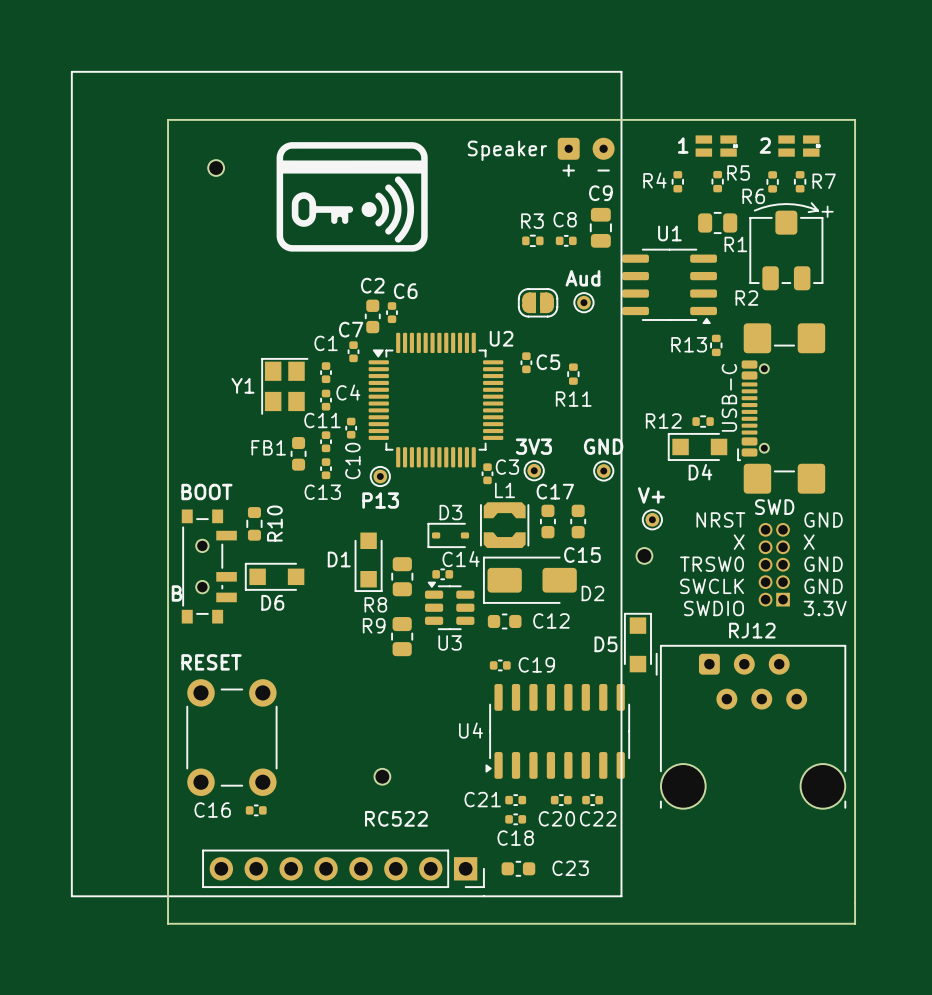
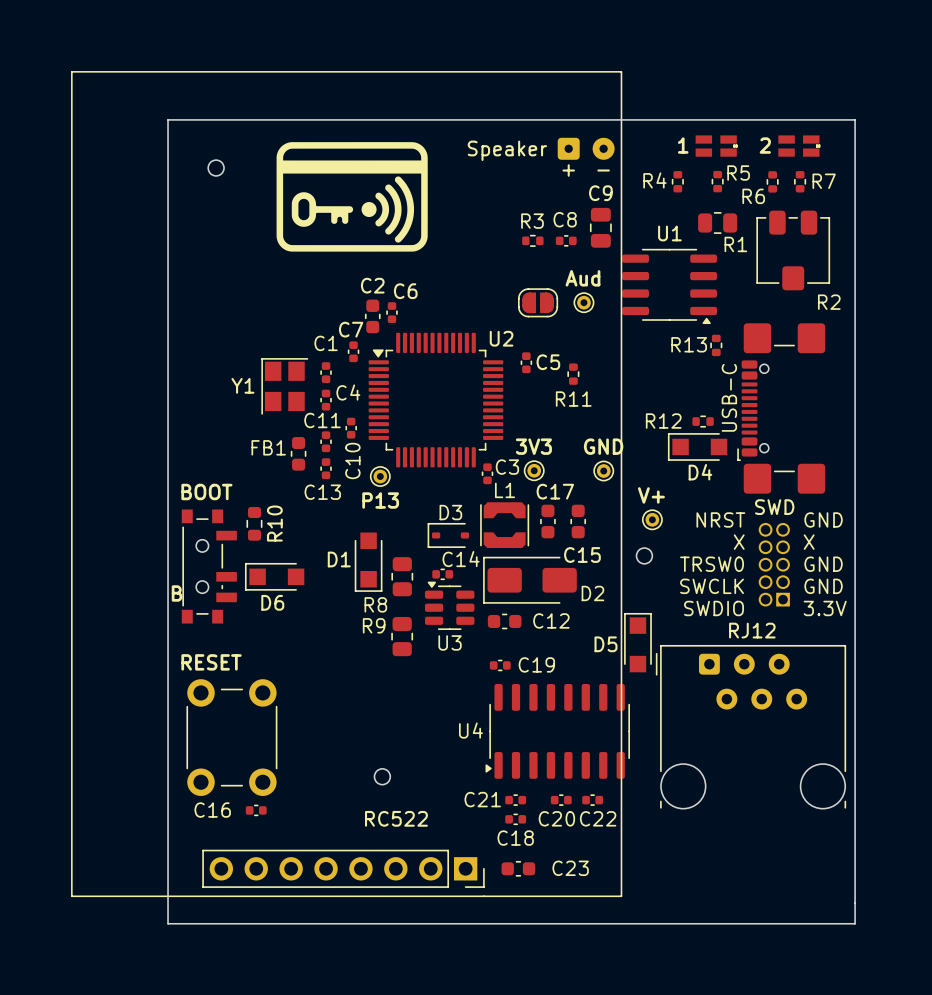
line: (811, 203) (817, 210) -> none
line: (754, 210) (770, 205) (786, 204) (802, 205) (817, 210) -> none
line: (817, 210) (808, 212) -> none
text: + (827, 211) -> none
R2 rotation: 0° (786, 250) -> 180° (793, 250)
R2 name position: R2 (746, 298) -> R2 (829, 302)

